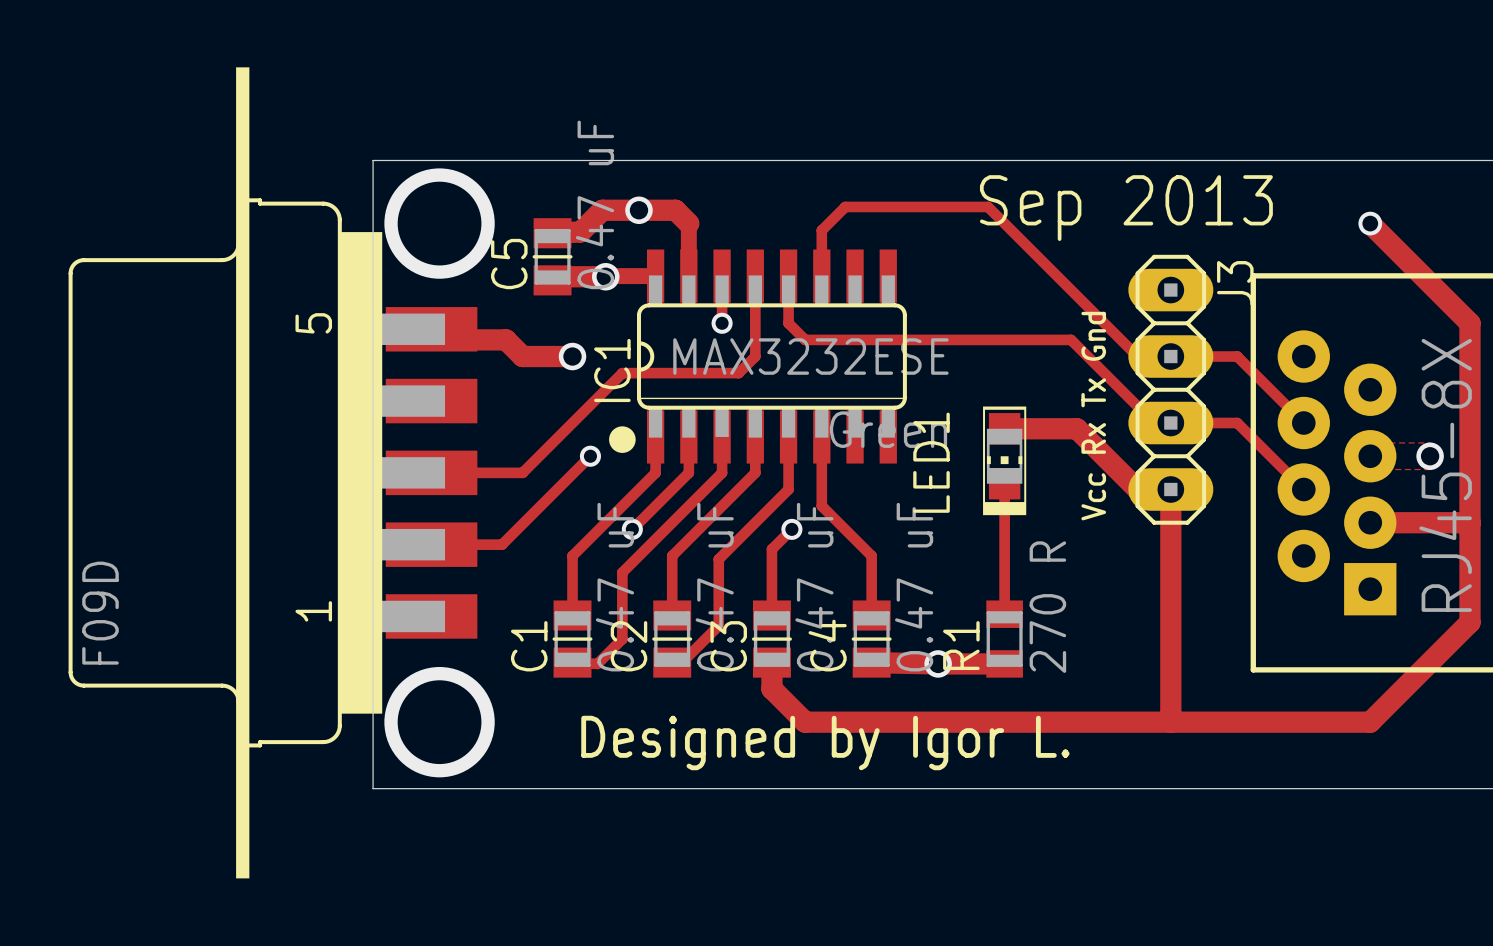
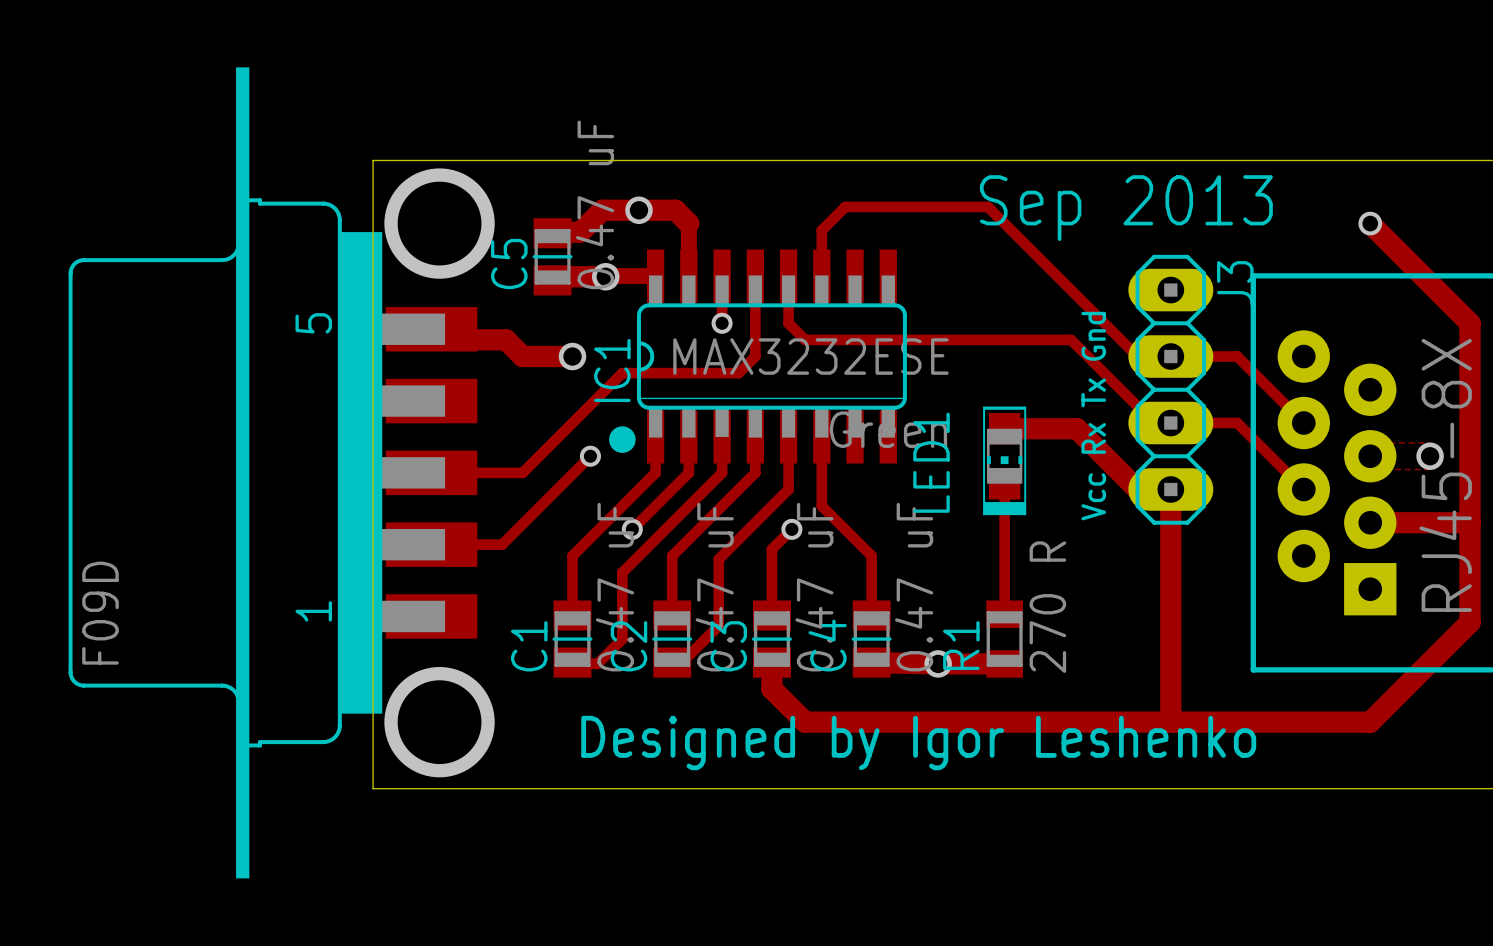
text: Designed by Igor L. (825, 743) -> Designed by Igor Leshenko (918, 743)

